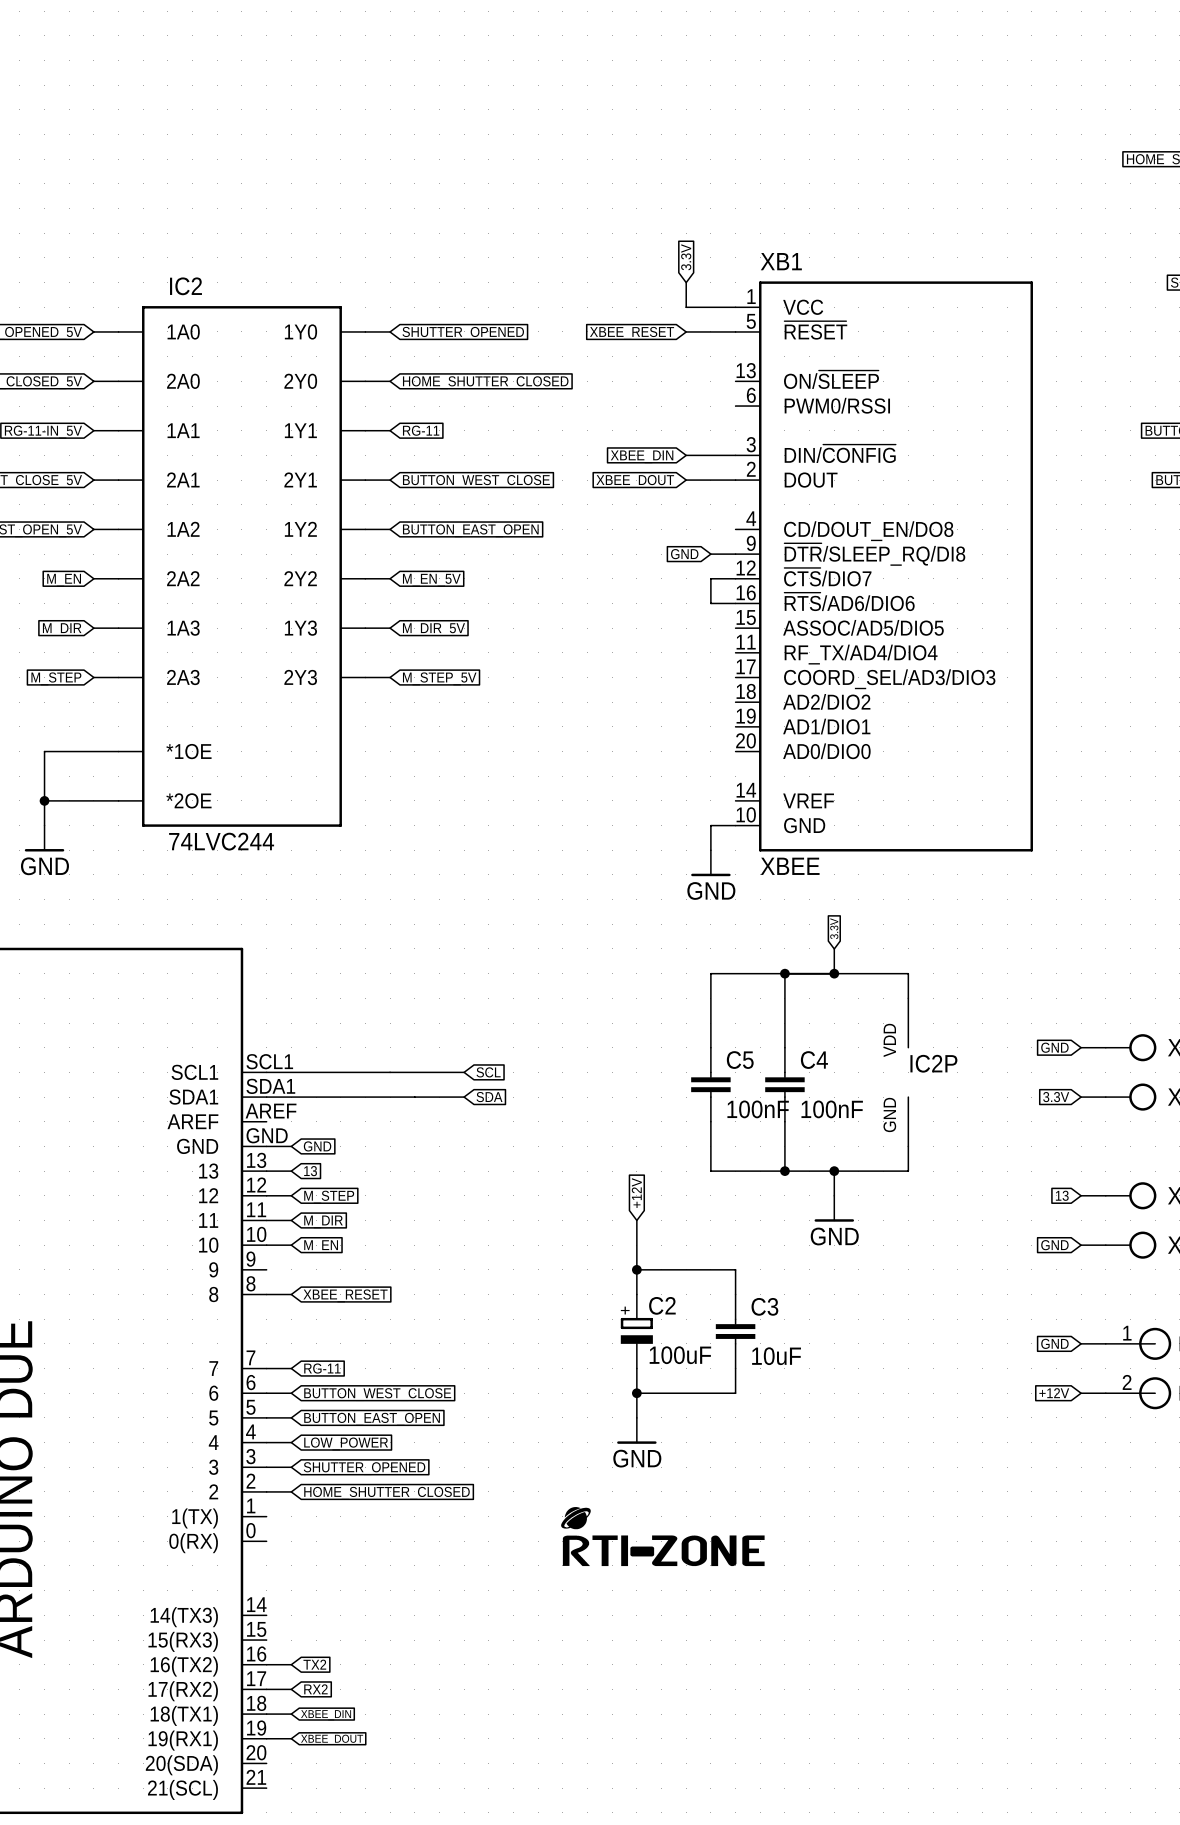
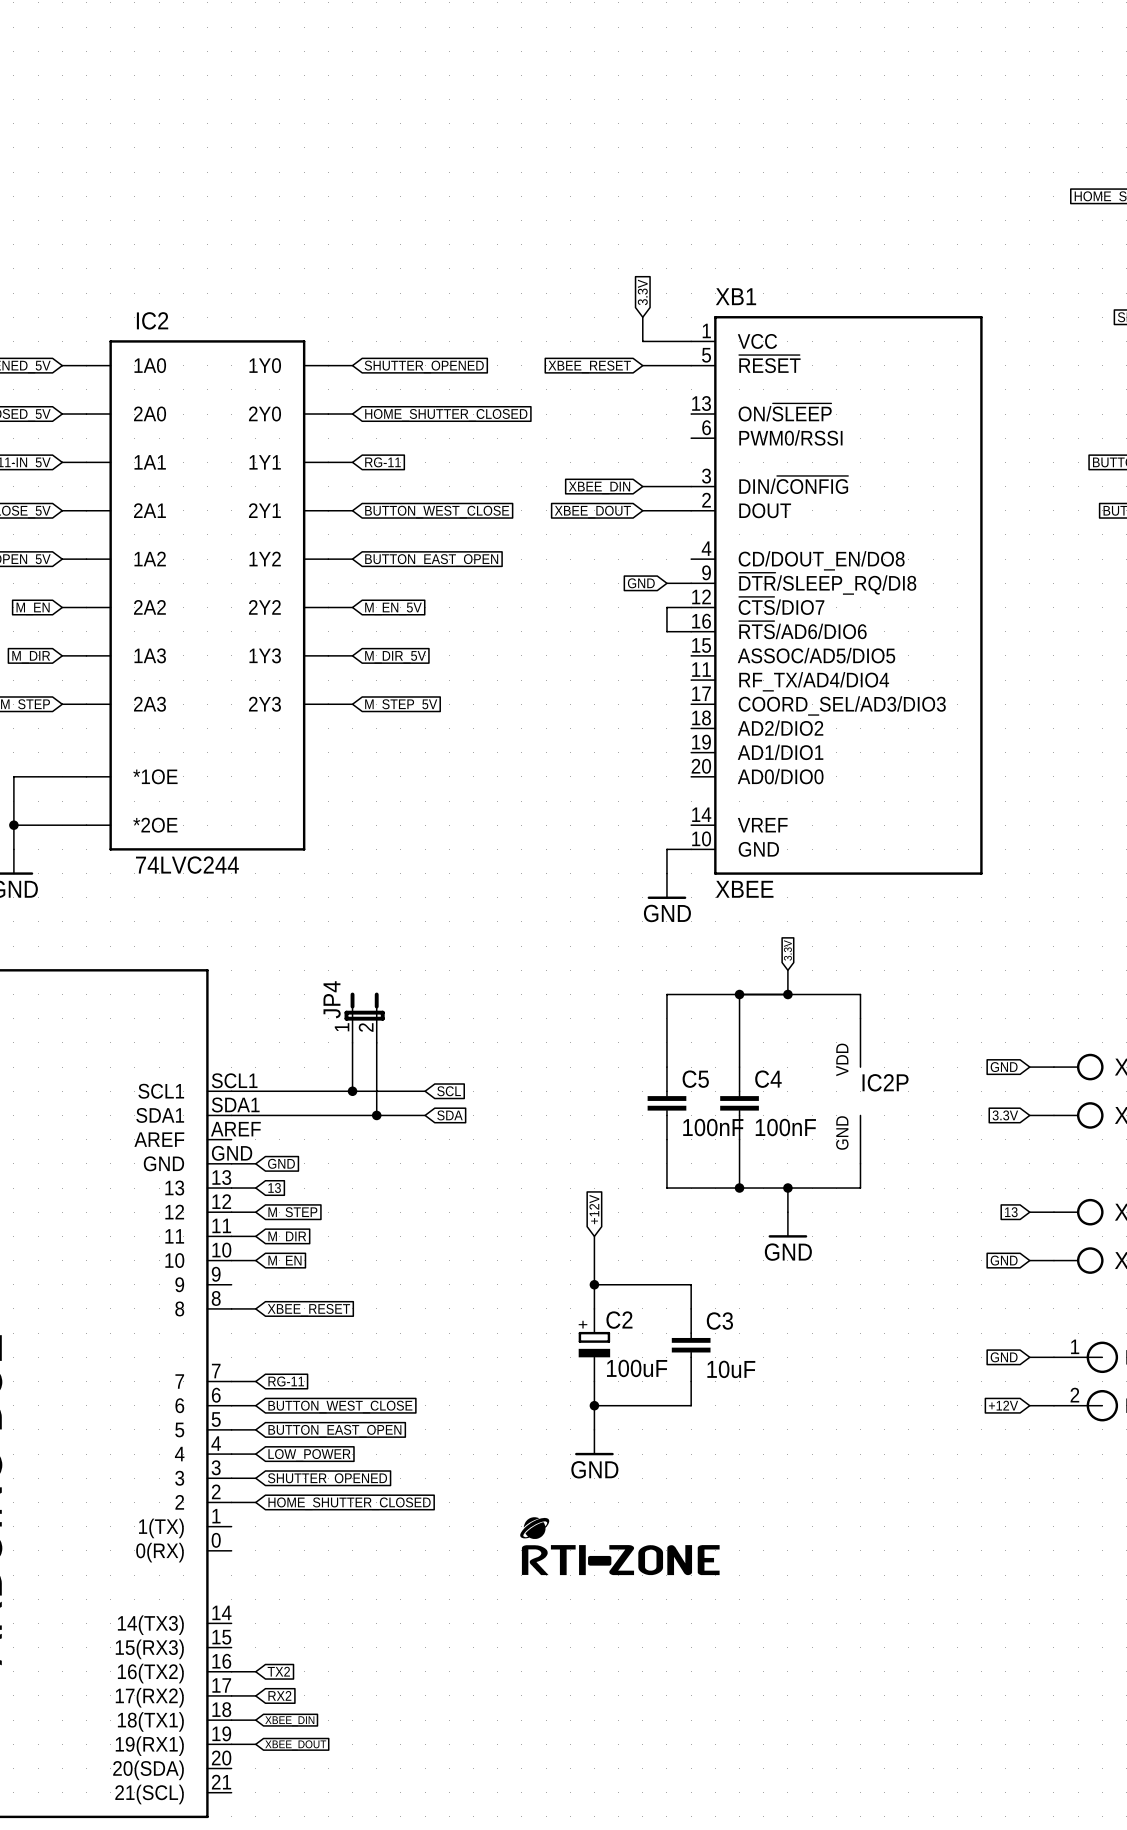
JP4: none -> (364, 1017)
wire: none -> (352, 1042) (352, 1091)
wire: none -> (376, 1042) (376, 1115)
junction: none -> (352, 1091)
junction: none -> (376, 1115)

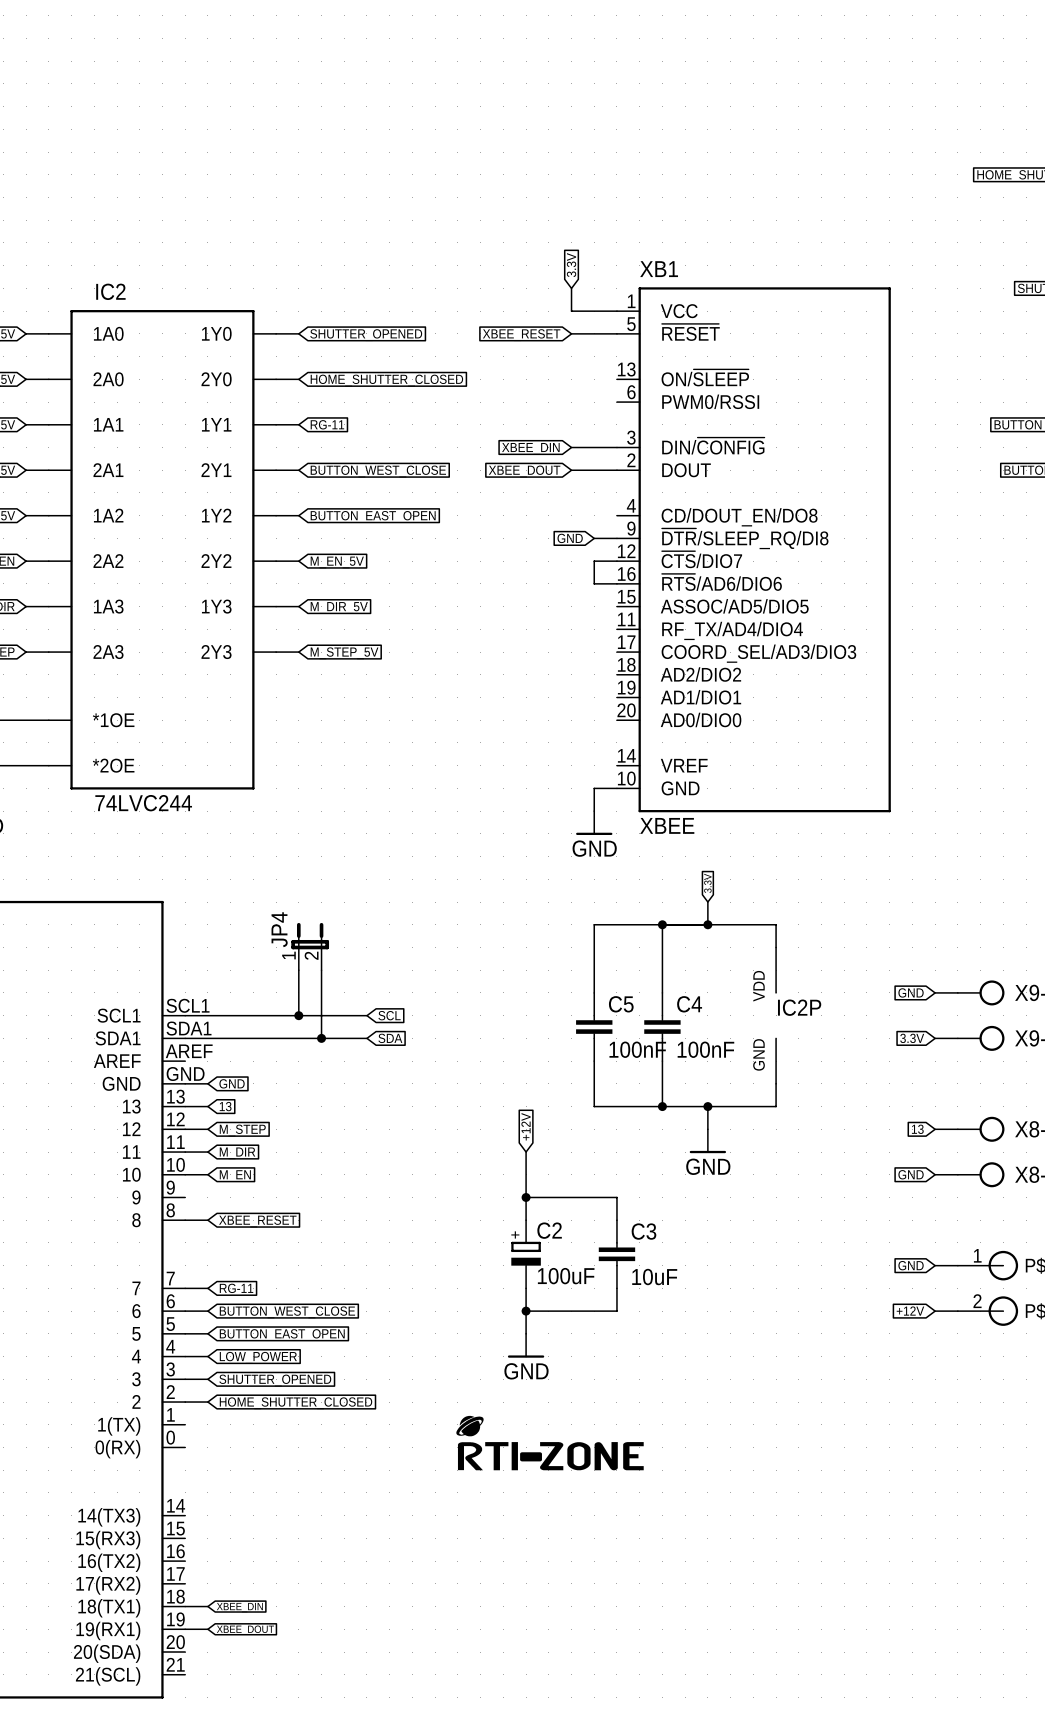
wire: (231, 1671) (255, 1671) -> none
global label: TX2 (278, 1671) -> none
wire: (231, 1695) (255, 1695) -> none
global label: RX2 (279, 1695) -> none

